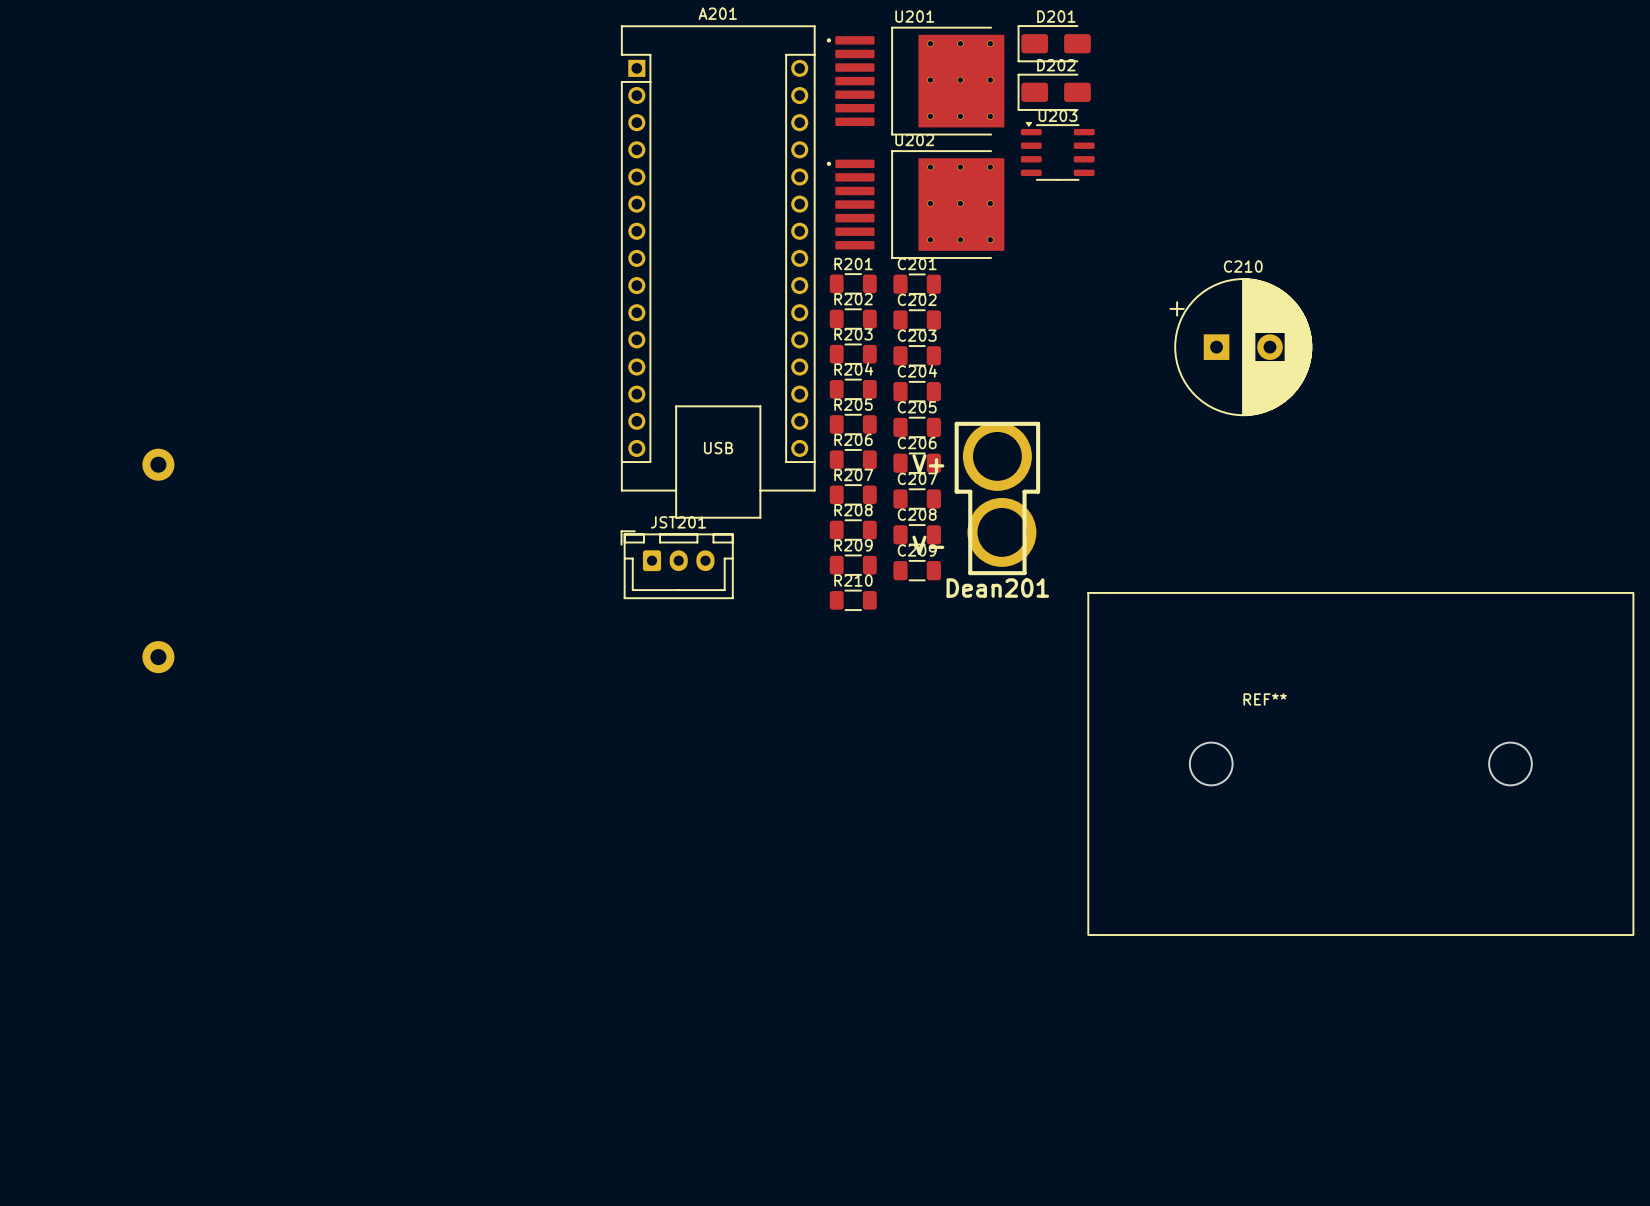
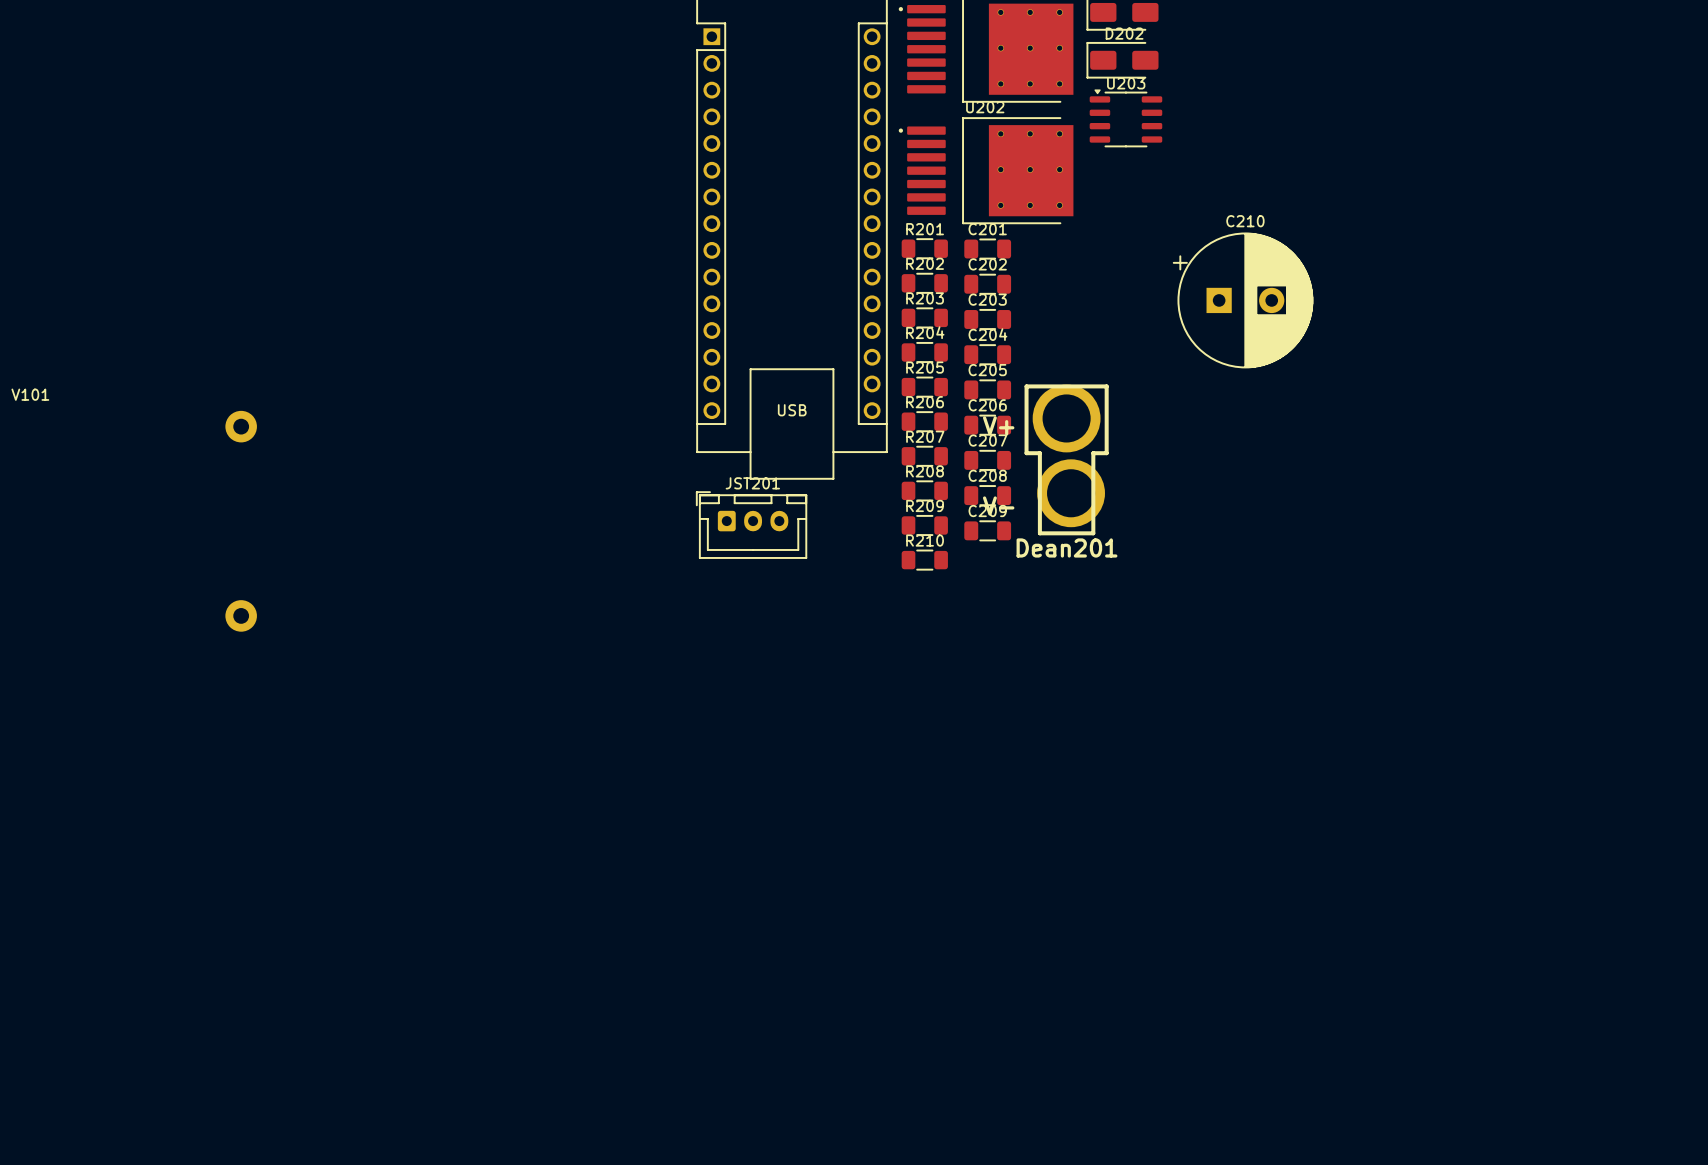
C210 position: (1240, 347) -> (1243, 300)
REF**: (1360, 763) -> none

